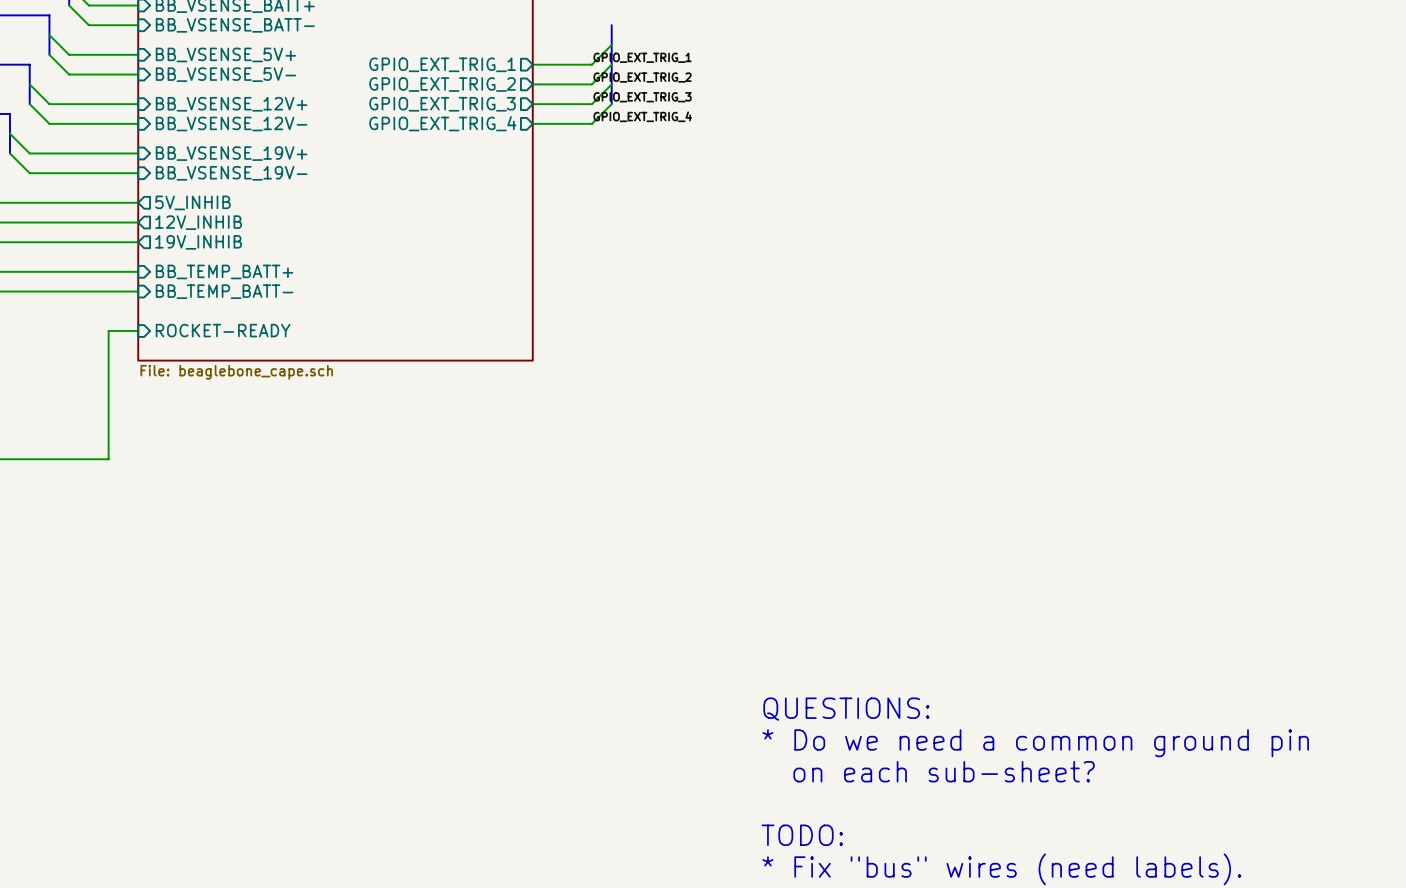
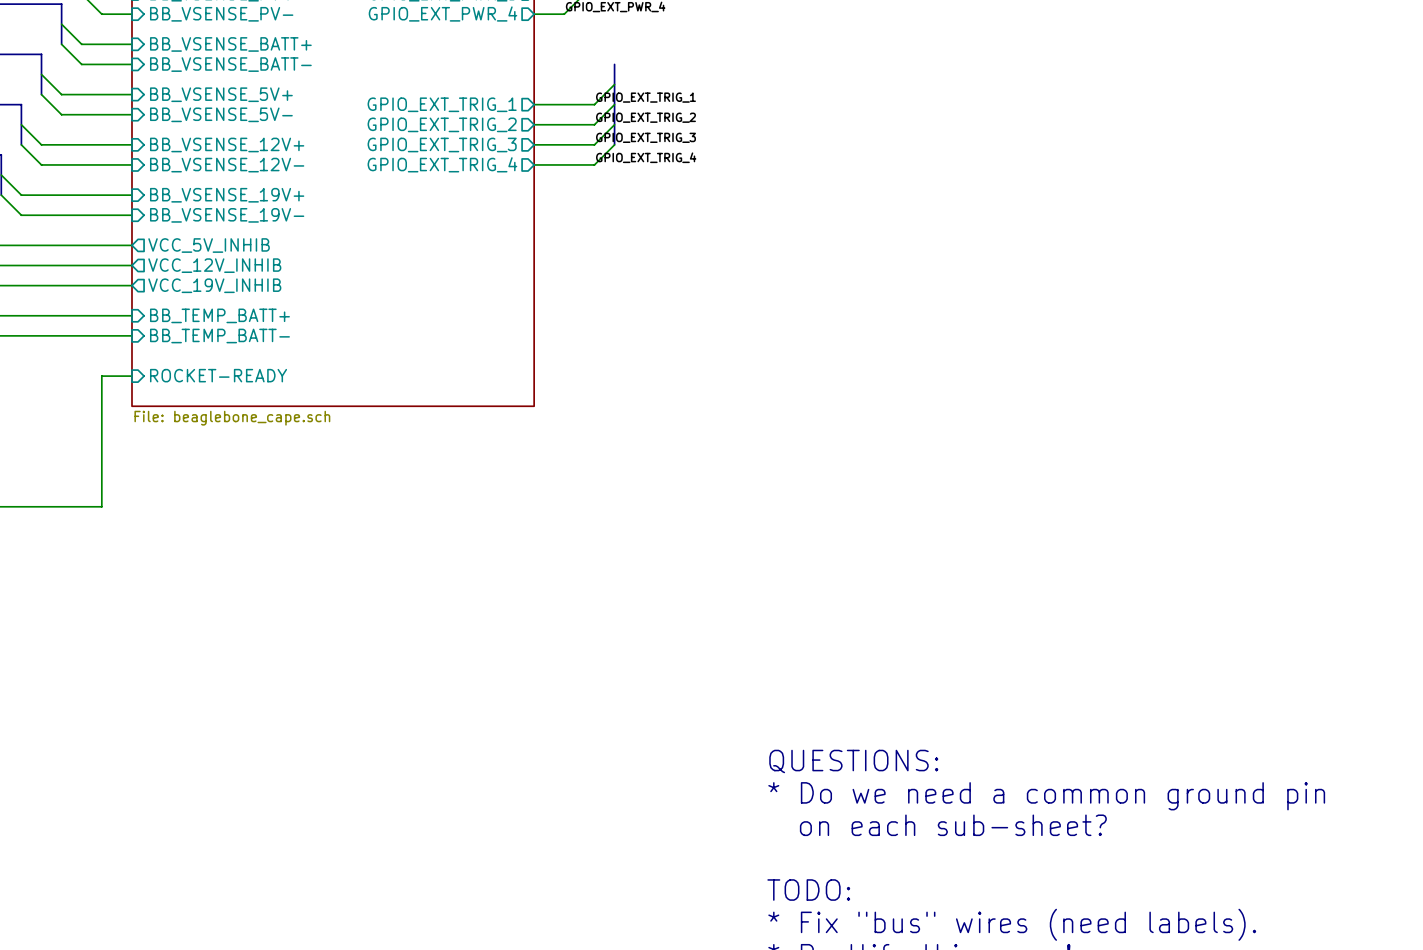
sheet pin: 5V_INHIB (192, 202) -> VCC_5V_INHIB (209, 245)
sheet pin: 12V_INHIB (198, 222) -> VCC_12V_INHIB (214, 265)
sheet pin: 19V_INHIB (198, 242) -> VCC_19V_INHIB (214, 285)

